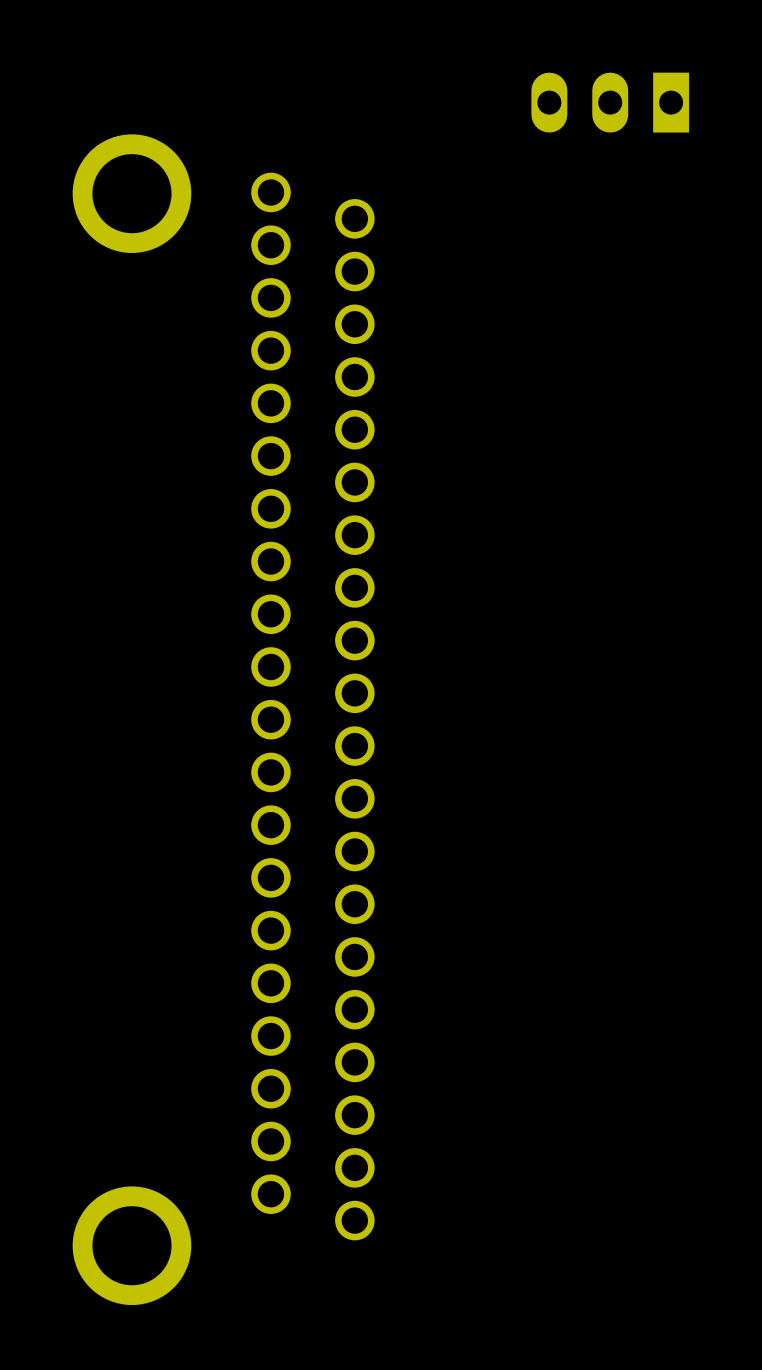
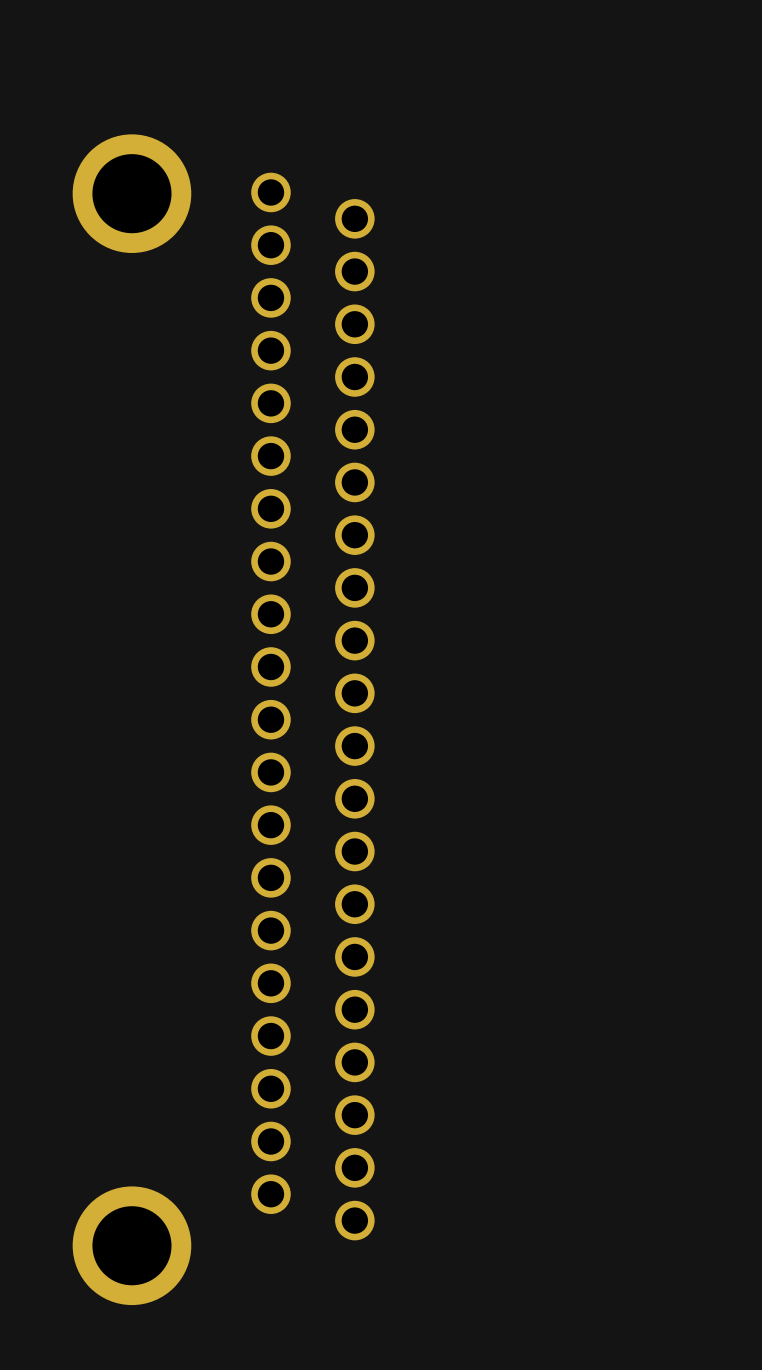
part: (610, 102) -> none

